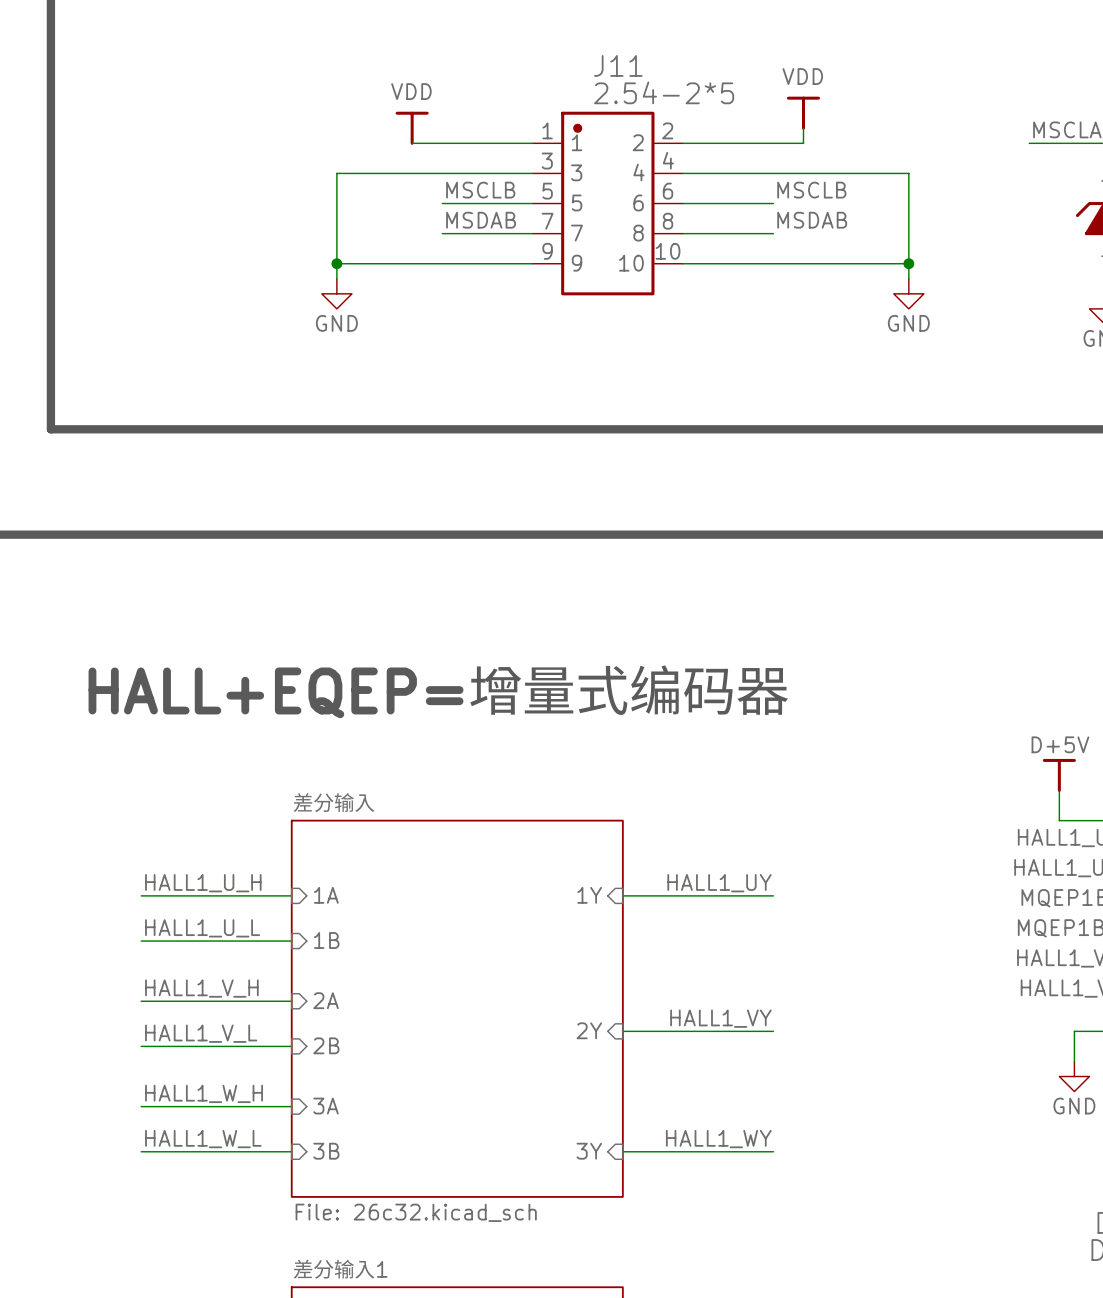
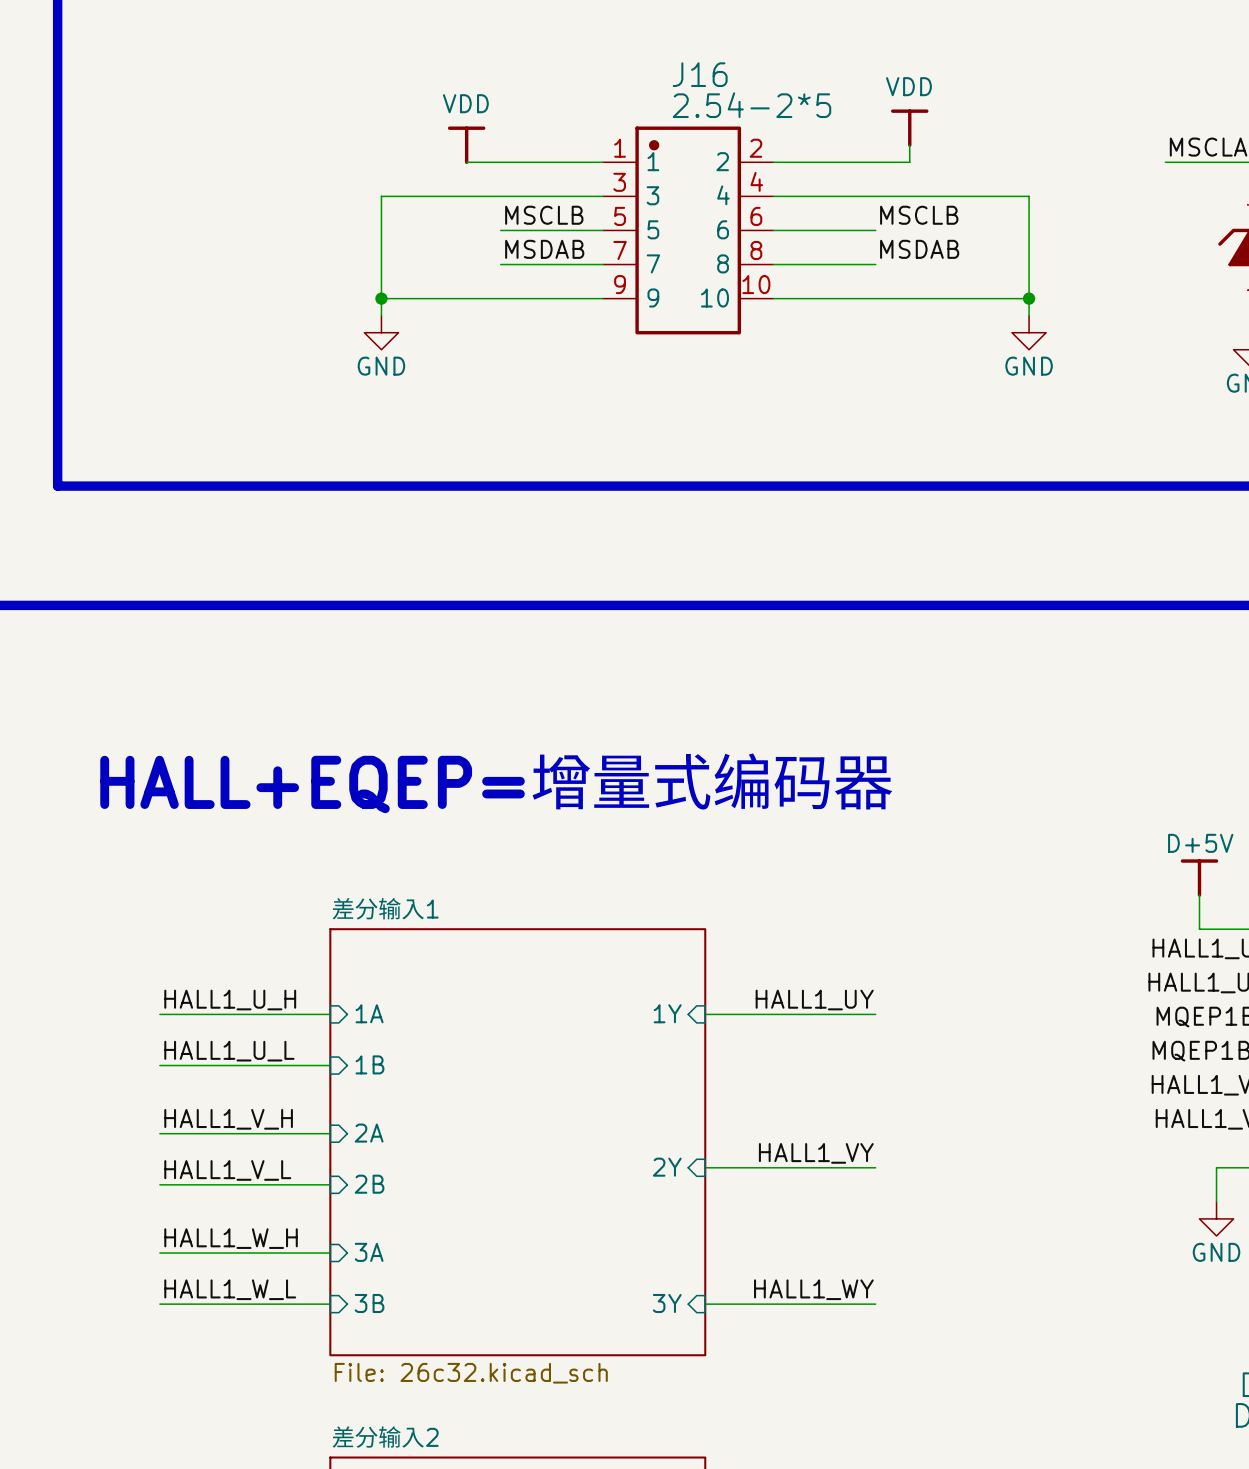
J11 name: J11 (618, 65) -> J16 (700, 74)
sheet 差分输入 name: 差分输入 (334, 802) -> 差分输入1 (385, 908)
sheet 差分输入1 name: 差分输入1 (340, 1269) -> 差分输入2 (385, 1437)

